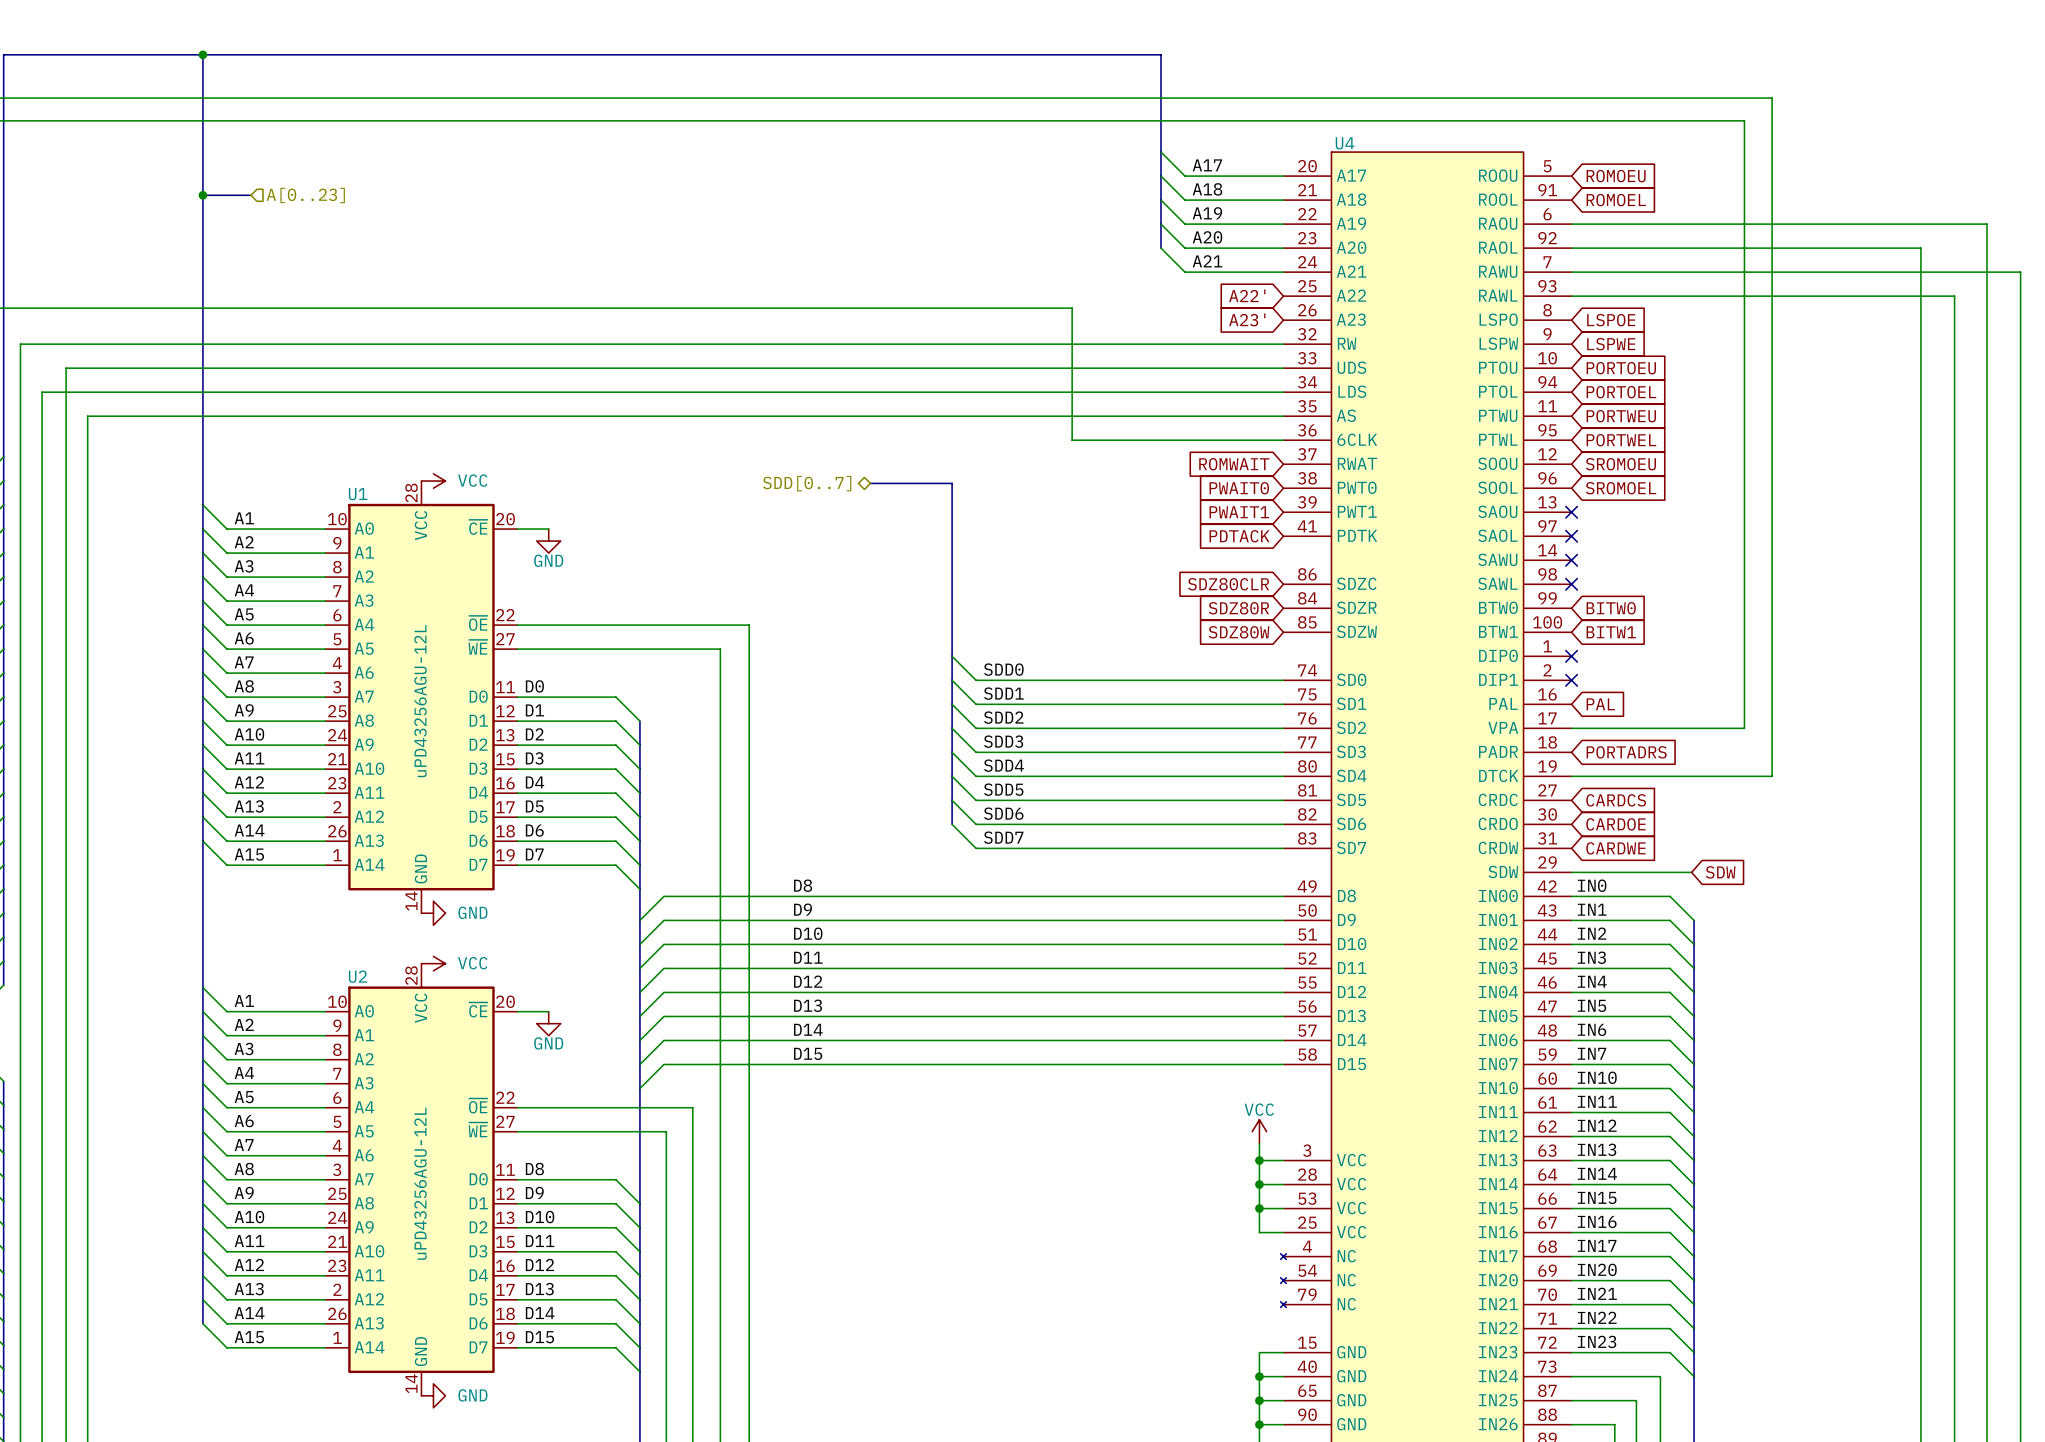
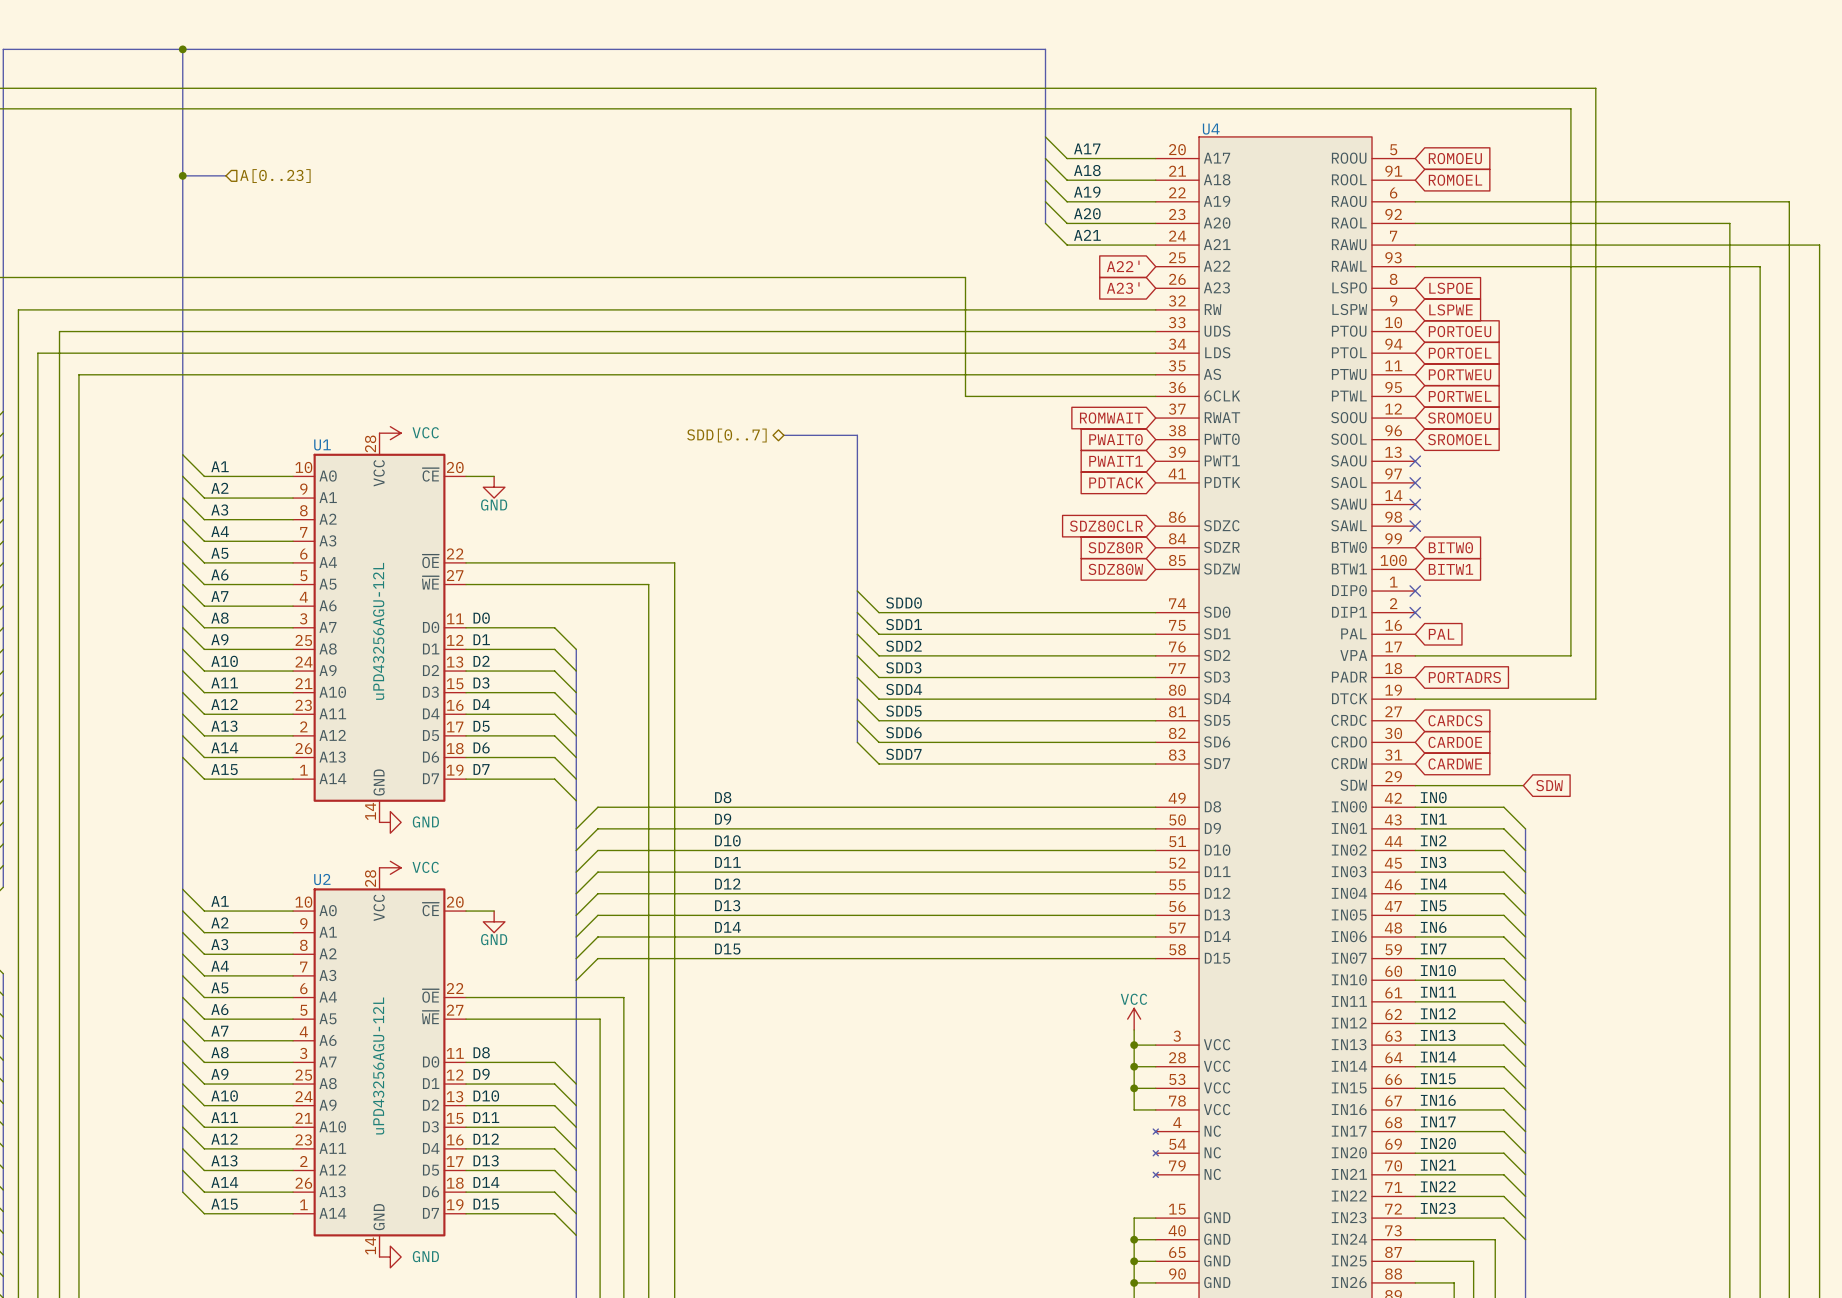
U4 pin number: 25 (1307, 1222) -> 78 (1177, 1101)

